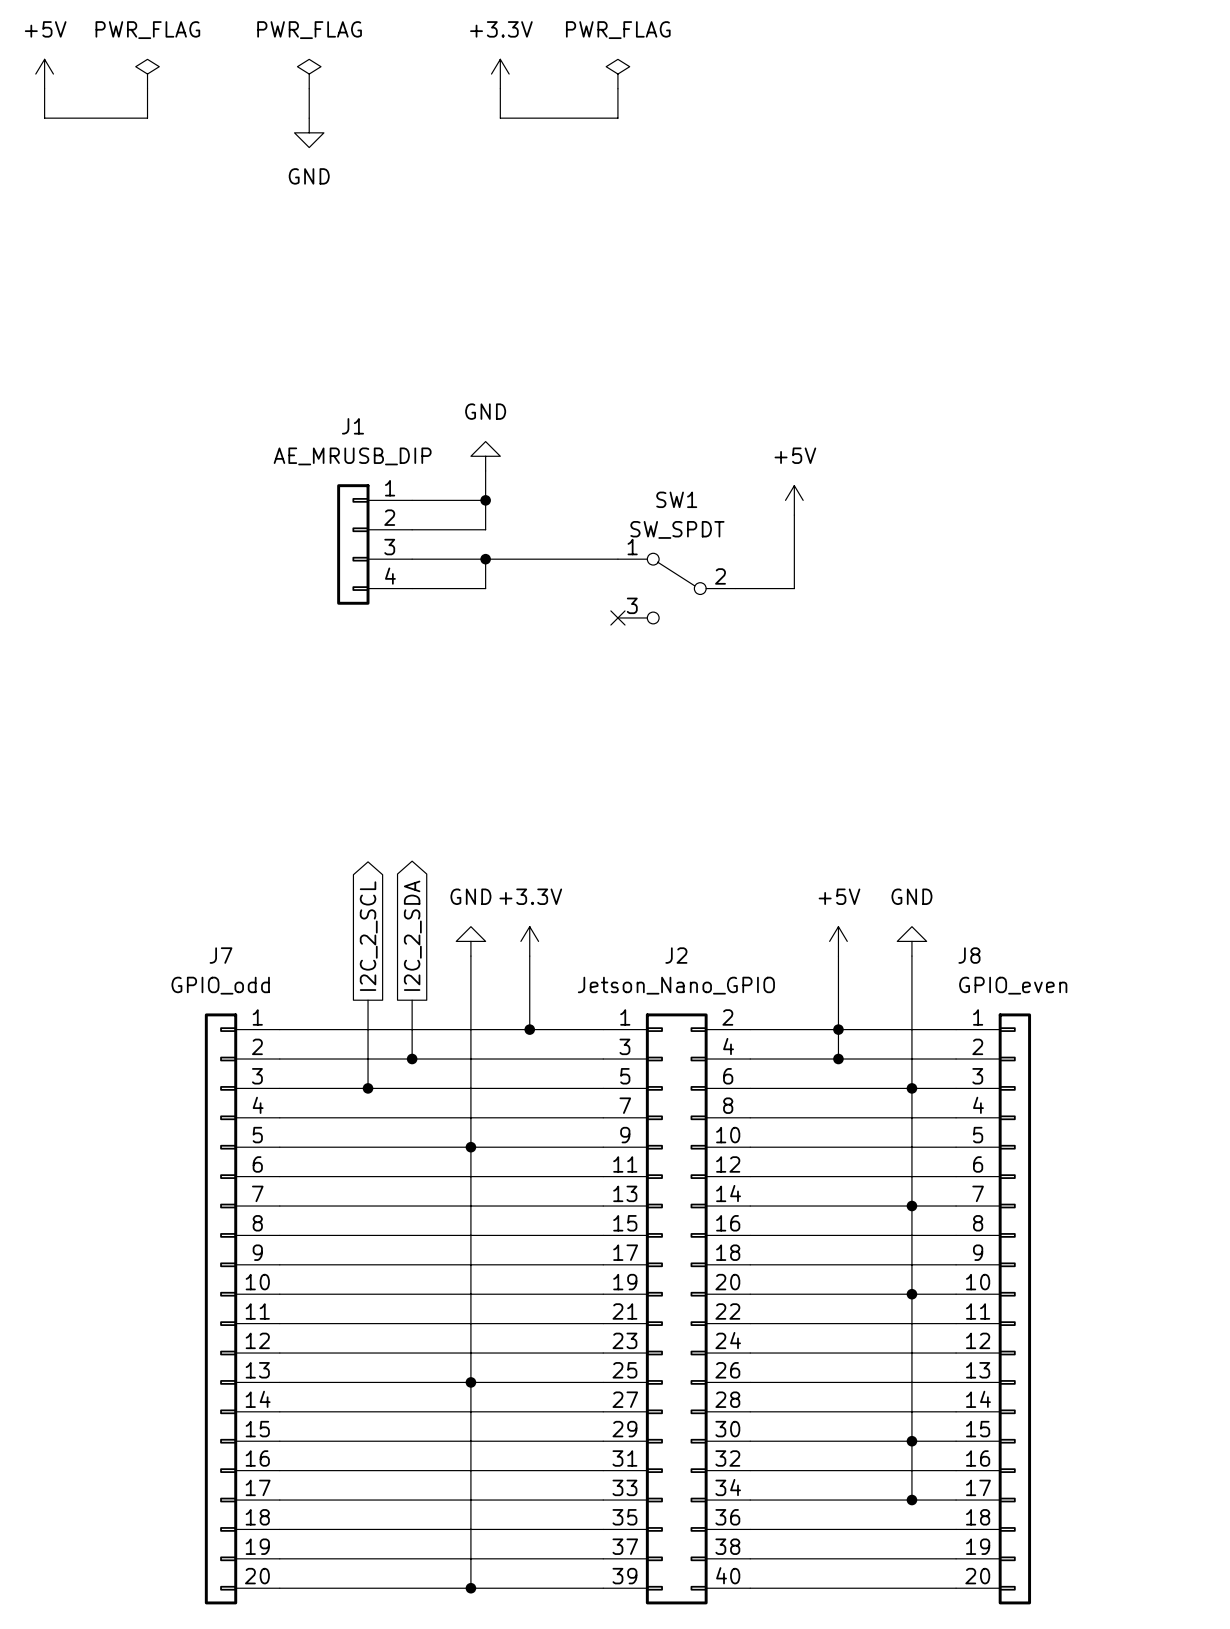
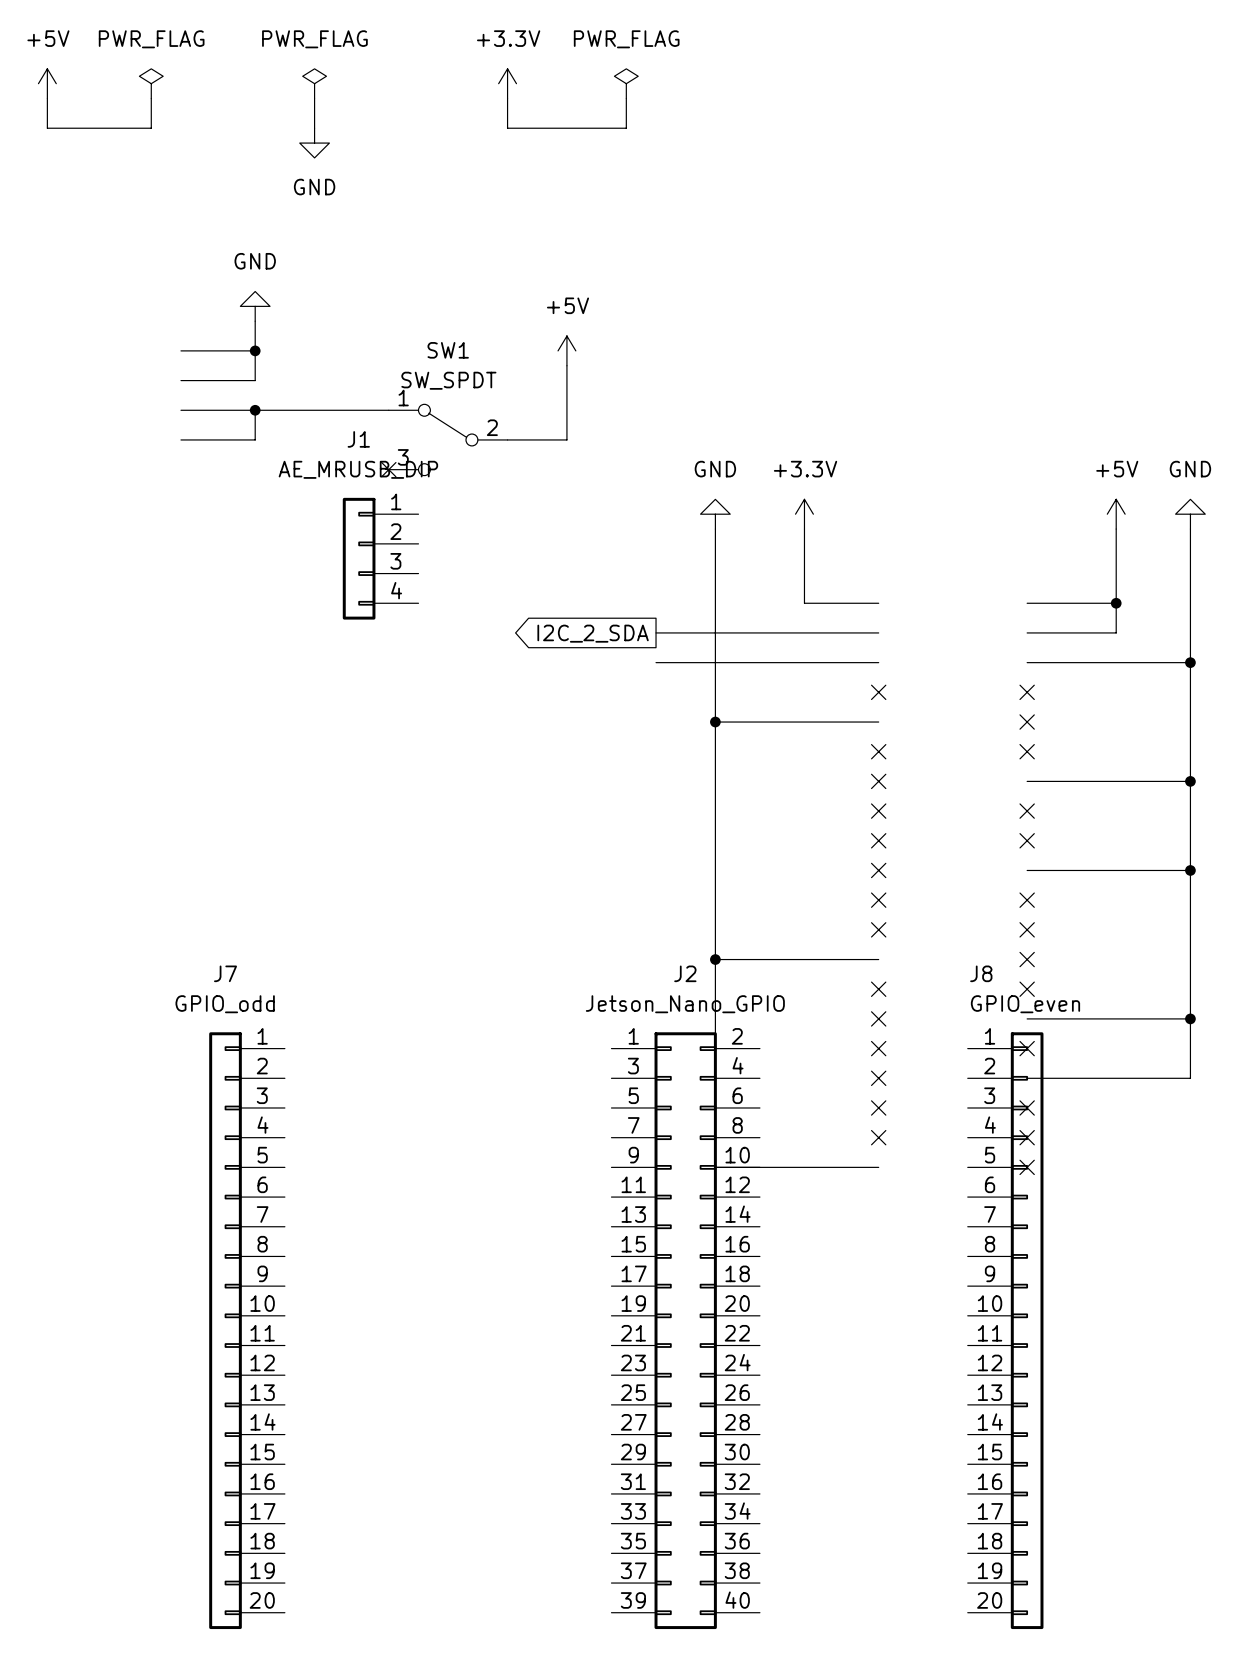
power symbol: none -> GND (255, 306)
junction: none -> (255, 350)
power symbol: none -> +5V (566, 350)
wire: none -> (566, 365) (566, 439) (507, 439)
junction: none -> (255, 410)
no-connect mark: none -> (388, 469)
power symbol: GND (485, 456) -> none
wire: (485, 470) (485, 529) (412, 529) -> (255, 321) (255, 380) (180, 380)
wire: (412, 500) (485, 500) -> (180, 350) (255, 350)
junction: (485, 500) -> none
power symbol: none -> GND (715, 514)
power symbol: +5V (794, 500) -> +3.3V (804, 514)
power symbol: none -> +5V (1116, 514)
power symbol: none -> GND (1190, 514)
wire: none -> (715, 529) (715, 1167) (759, 1167)
wire: none -> (1116, 529) (1116, 632) (1027, 632)
wire: none -> (1190, 529) (1190, 1078) (1027, 1078)
wire: (412, 559) (617, 559) -> (180, 410) (388, 410)
wire: (485, 559) (485, 588) (412, 588) -> (255, 410) (255, 439) (180, 439)
junction: (485, 559) -> none
SW1 position: (676, 588) -> (448, 439)
wire: (735, 588) (794, 588) -> (878, 603) (804, 603)
wire: none -> (1027, 603) (1116, 603)
junction: none -> (1116, 603)
no-connect mark: (617, 617) -> none
wire: none -> (656, 632) (878, 632)
global label: none -> I2C_2_SDA (593, 633)
wire: none -> (656, 662) (878, 662)
wire: none -> (1027, 662) (1190, 662)
junction: none -> (1190, 662)
no-connect mark: none -> (878, 692)
no-connect mark: none -> (1027, 692)
wire: none -> (715, 722) (878, 722)
junction: none -> (715, 722)
no-connect mark: none -> (1027, 722)
no-connect mark: none -> (878, 751)
no-connect mark: none -> (1027, 751)
no-connect mark: none -> (878, 781)
wire: none -> (1027, 781) (1190, 781)
junction: none -> (1190, 781)
no-connect mark: none -> (878, 811)
no-connect mark: none -> (1027, 811)
no-connect mark: none -> (878, 840)
no-connect mark: none -> (1027, 840)
no-connect mark: none -> (878, 870)
wire: none -> (1027, 870) (1190, 870)
junction: none -> (1190, 870)
no-connect mark: none -> (878, 900)
no-connect mark: none -> (1027, 900)
no-connect mark: none -> (878, 929)
no-connect mark: none -> (1027, 929)
global label: I2C_2_SDA (412, 935) -> none
global label: I2C_2_SCL (368, 936) -> none
power symbol: GND (470, 941) -> none
power symbol: +3.3V (529, 941) -> none
wire: none -> (715, 959) (878, 959)
junction: none -> (715, 959)
power symbol: +5V (838, 941) -> none
power symbol: GND (911, 941) -> none
no-connect mark: none -> (1027, 959)
wire: (470, 956) (470, 1588) -> none
wire: (529, 956) (529, 1029) -> none
wire: (838, 956) (838, 1059) -> none
wire: (911, 956) (911, 1500) -> none
no-connect mark: none -> (878, 989)
no-connect mark: none -> (1027, 989)
wire: (368, 1000) (368, 1088) -> none
wire: (412, 1000) (412, 1059) -> none
no-connect mark: none -> (878, 1018)
wire: none -> (1027, 1018) (1190, 1018)
junction: none -> (1190, 1018)
wire: (279, 1029) (603, 1029) -> none
junction: (529, 1029) -> none
wire: (750, 1029) (956, 1029) -> none
junction: (838, 1029) -> none
no-connect mark: none -> (878, 1048)
no-connect mark: none -> (1027, 1048)
wire: (279, 1059) (603, 1059) -> none
junction: (412, 1059) -> none
wire: (750, 1059) (956, 1059) -> none
junction: (838, 1059) -> none
no-connect mark: none -> (878, 1078)
wire: (279, 1088) (603, 1088) -> none
junction: (368, 1088) -> none
wire: (750, 1088) (956, 1088) -> none
no-connect mark: none -> (878, 1107)
junction: (911, 1088) -> none
no-connect mark: none -> (1027, 1107)
wire: (279, 1117) (603, 1117) -> none
wire: (750, 1117) (956, 1117) -> none
no-connect mark: none -> (878, 1137)
no-connect mark: none -> (1027, 1137)
wire: (279, 1147) (603, 1147) -> none
junction: (470, 1147) -> none
wire: (867, 1147) (956, 1147) -> none
no-connect mark: none -> (1027, 1167)
wire: (279, 1176) (603, 1176) -> none
wire: (750, 1176) (956, 1176) -> none
wire: (279, 1206) (603, 1206) -> none
wire: (750, 1206) (956, 1206) -> none
junction: (911, 1206) -> none
wire: (279, 1235) (603, 1235) -> none
wire: (750, 1235) (956, 1235) -> none
wire: (279, 1264) (603, 1264) -> none
wire: (750, 1264) (956, 1264) -> none
wire: (279, 1294) (603, 1294) -> none
wire: (750, 1294) (956, 1294) -> none
junction: (911, 1294) -> none
wire: (279, 1323) (603, 1323) -> none
wire: (750, 1323) (956, 1323) -> none
wire: (279, 1353) (603, 1353) -> none
wire: (750, 1353) (956, 1353) -> none
wire: (279, 1382) (603, 1382) -> none
junction: (470, 1382) -> none
wire: (750, 1382) (956, 1382) -> none
wire: (279, 1411) (603, 1411) -> none
wire: (750, 1411) (956, 1411) -> none
wire: (279, 1441) (603, 1441) -> none
wire: (750, 1441) (956, 1441) -> none
junction: (911, 1441) -> none
wire: (279, 1470) (603, 1470) -> none
wire: (750, 1470) (956, 1470) -> none
wire: (279, 1500) (603, 1500) -> none
wire: (750, 1500) (956, 1500) -> none
junction: (911, 1500) -> none
wire: (279, 1529) (603, 1529) -> none
wire: (750, 1529) (956, 1529) -> none
wire: (279, 1558) (603, 1558) -> none
wire: (750, 1558) (956, 1558) -> none
wire: (279, 1588) (603, 1588) -> none
junction: (470, 1588) -> none
wire: (750, 1588) (956, 1588) -> none

